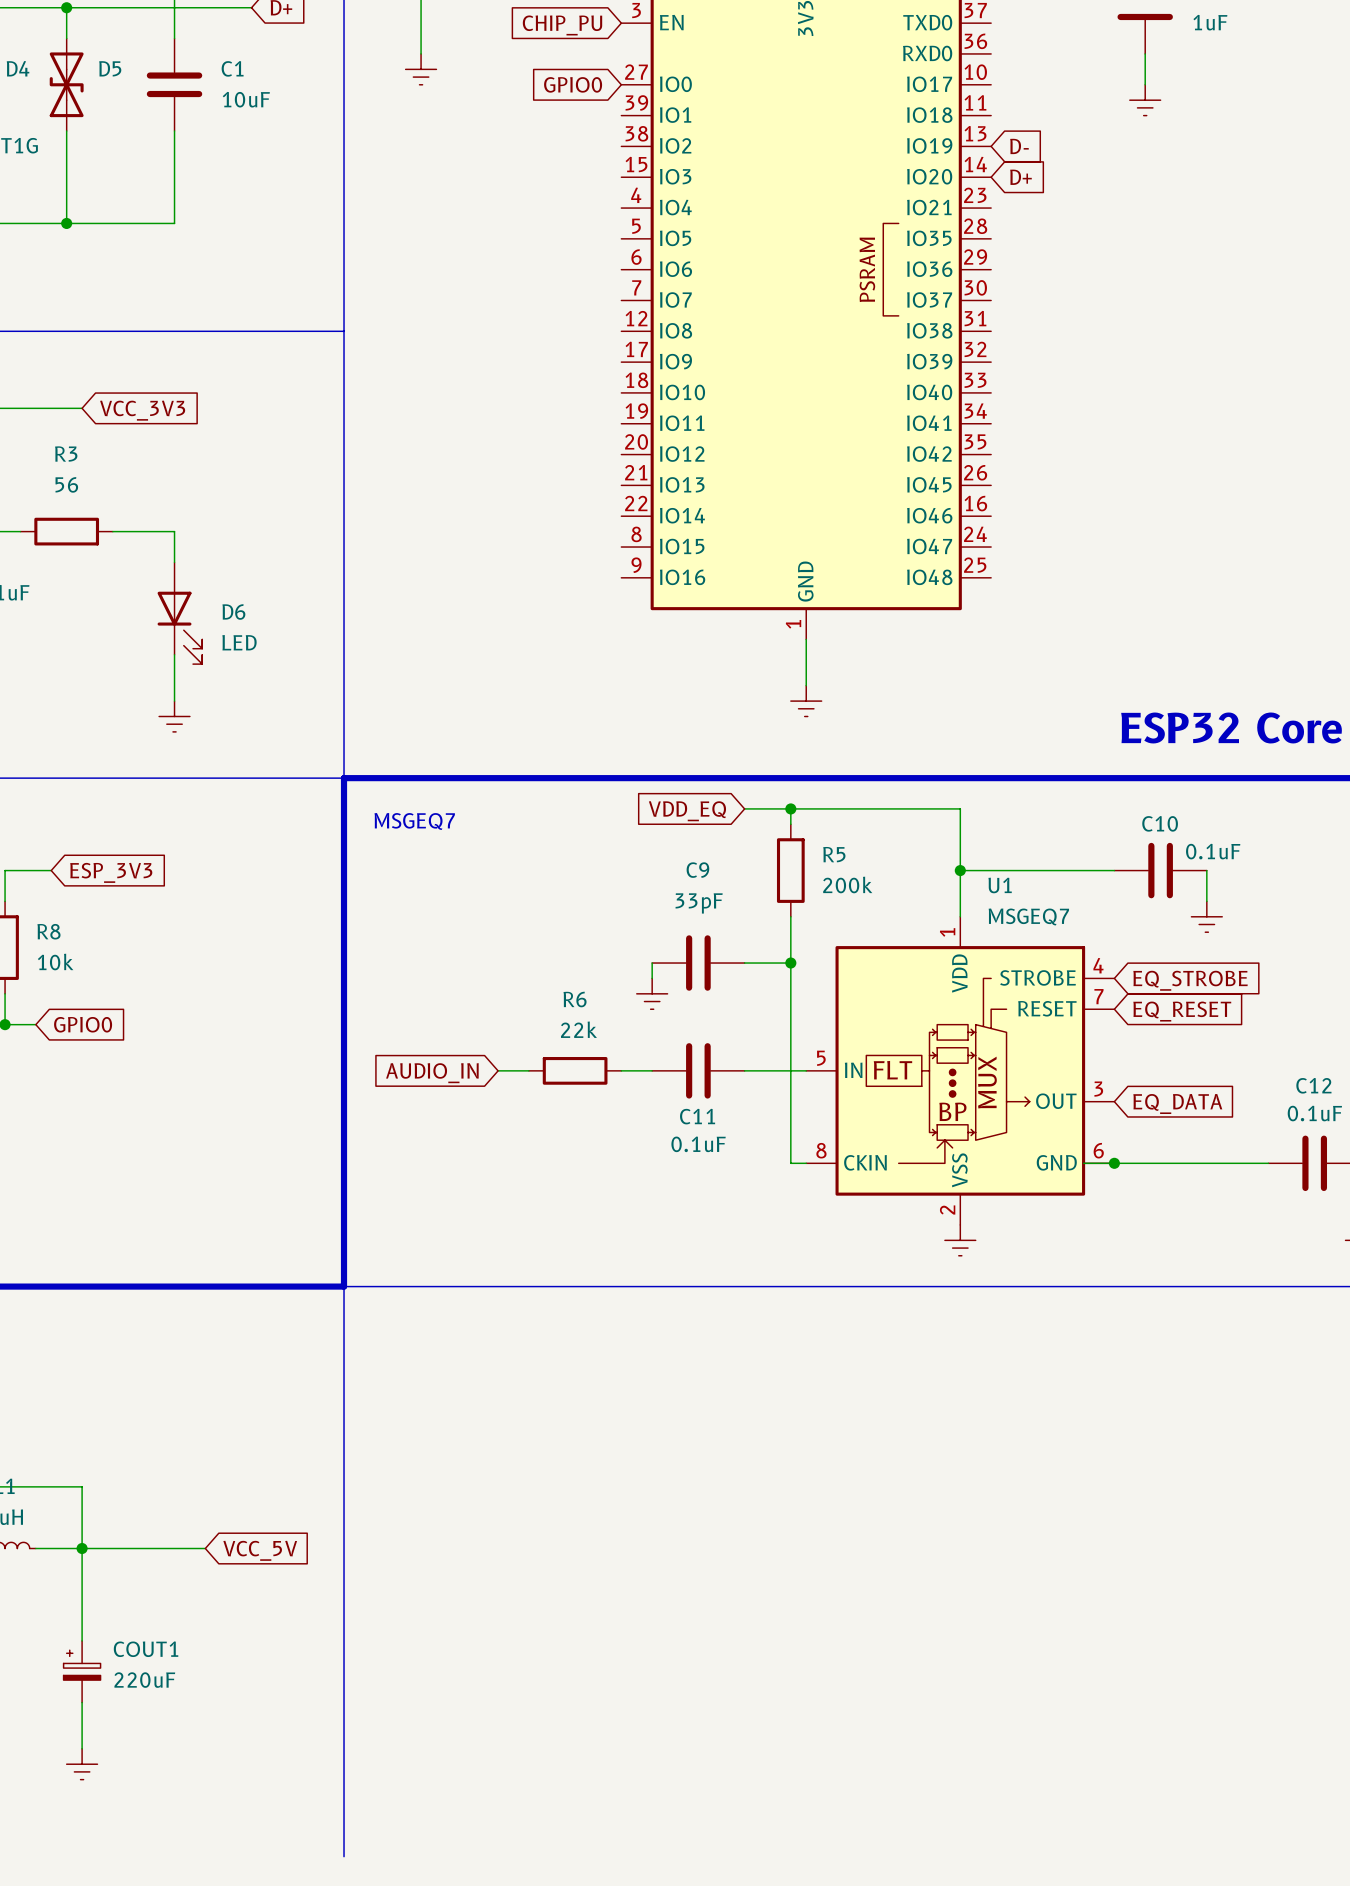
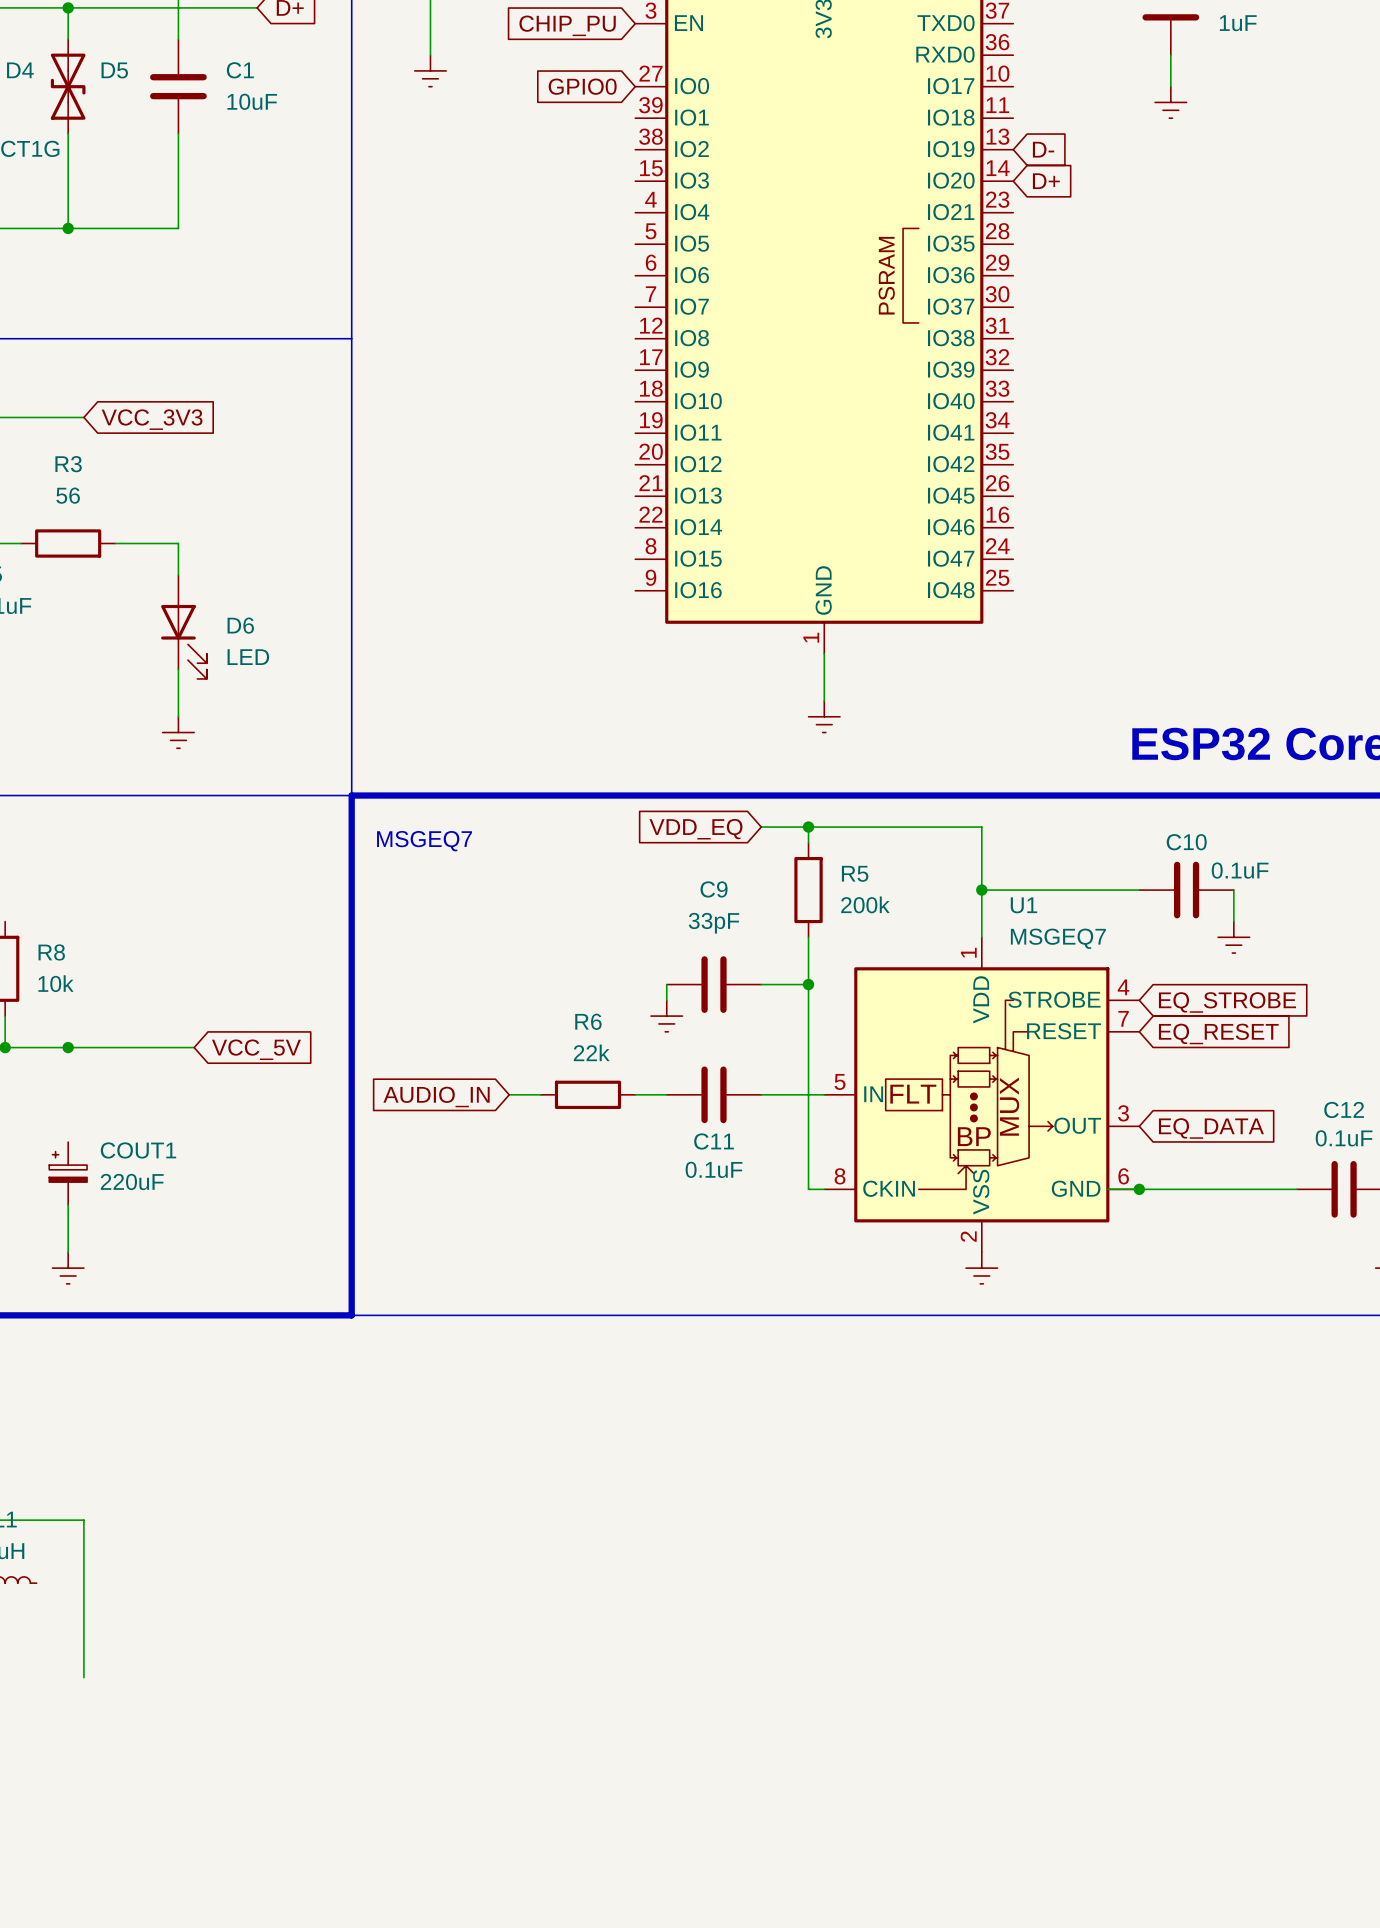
wire: (51, 870) (5, 870) (5, 901) -> none
global label: ESP_3V3 (111, 872) -> none
wire: none -> (36, 1047) (194, 1047)
junction: none -> (68, 1047)
global label: GPIO0 (83, 1024) -> none
global label: none -> VCC_5V (256, 1049)
wire: none -> (68, 1205) (68, 1252)
power symbol: none -> (68, 1268)
line: (344, 1286) (344, 1856) -> none
wire: (35, 1548) (205, 1548) -> none
junction: (82, 1548) -> none
global label: VCC_5V (260, 1550) -> none
COUT1 position: (82, 1671) -> (68, 1173)
wire: (82, 1702) (82, 1748) -> none
power symbol: (82, 1764) -> none

